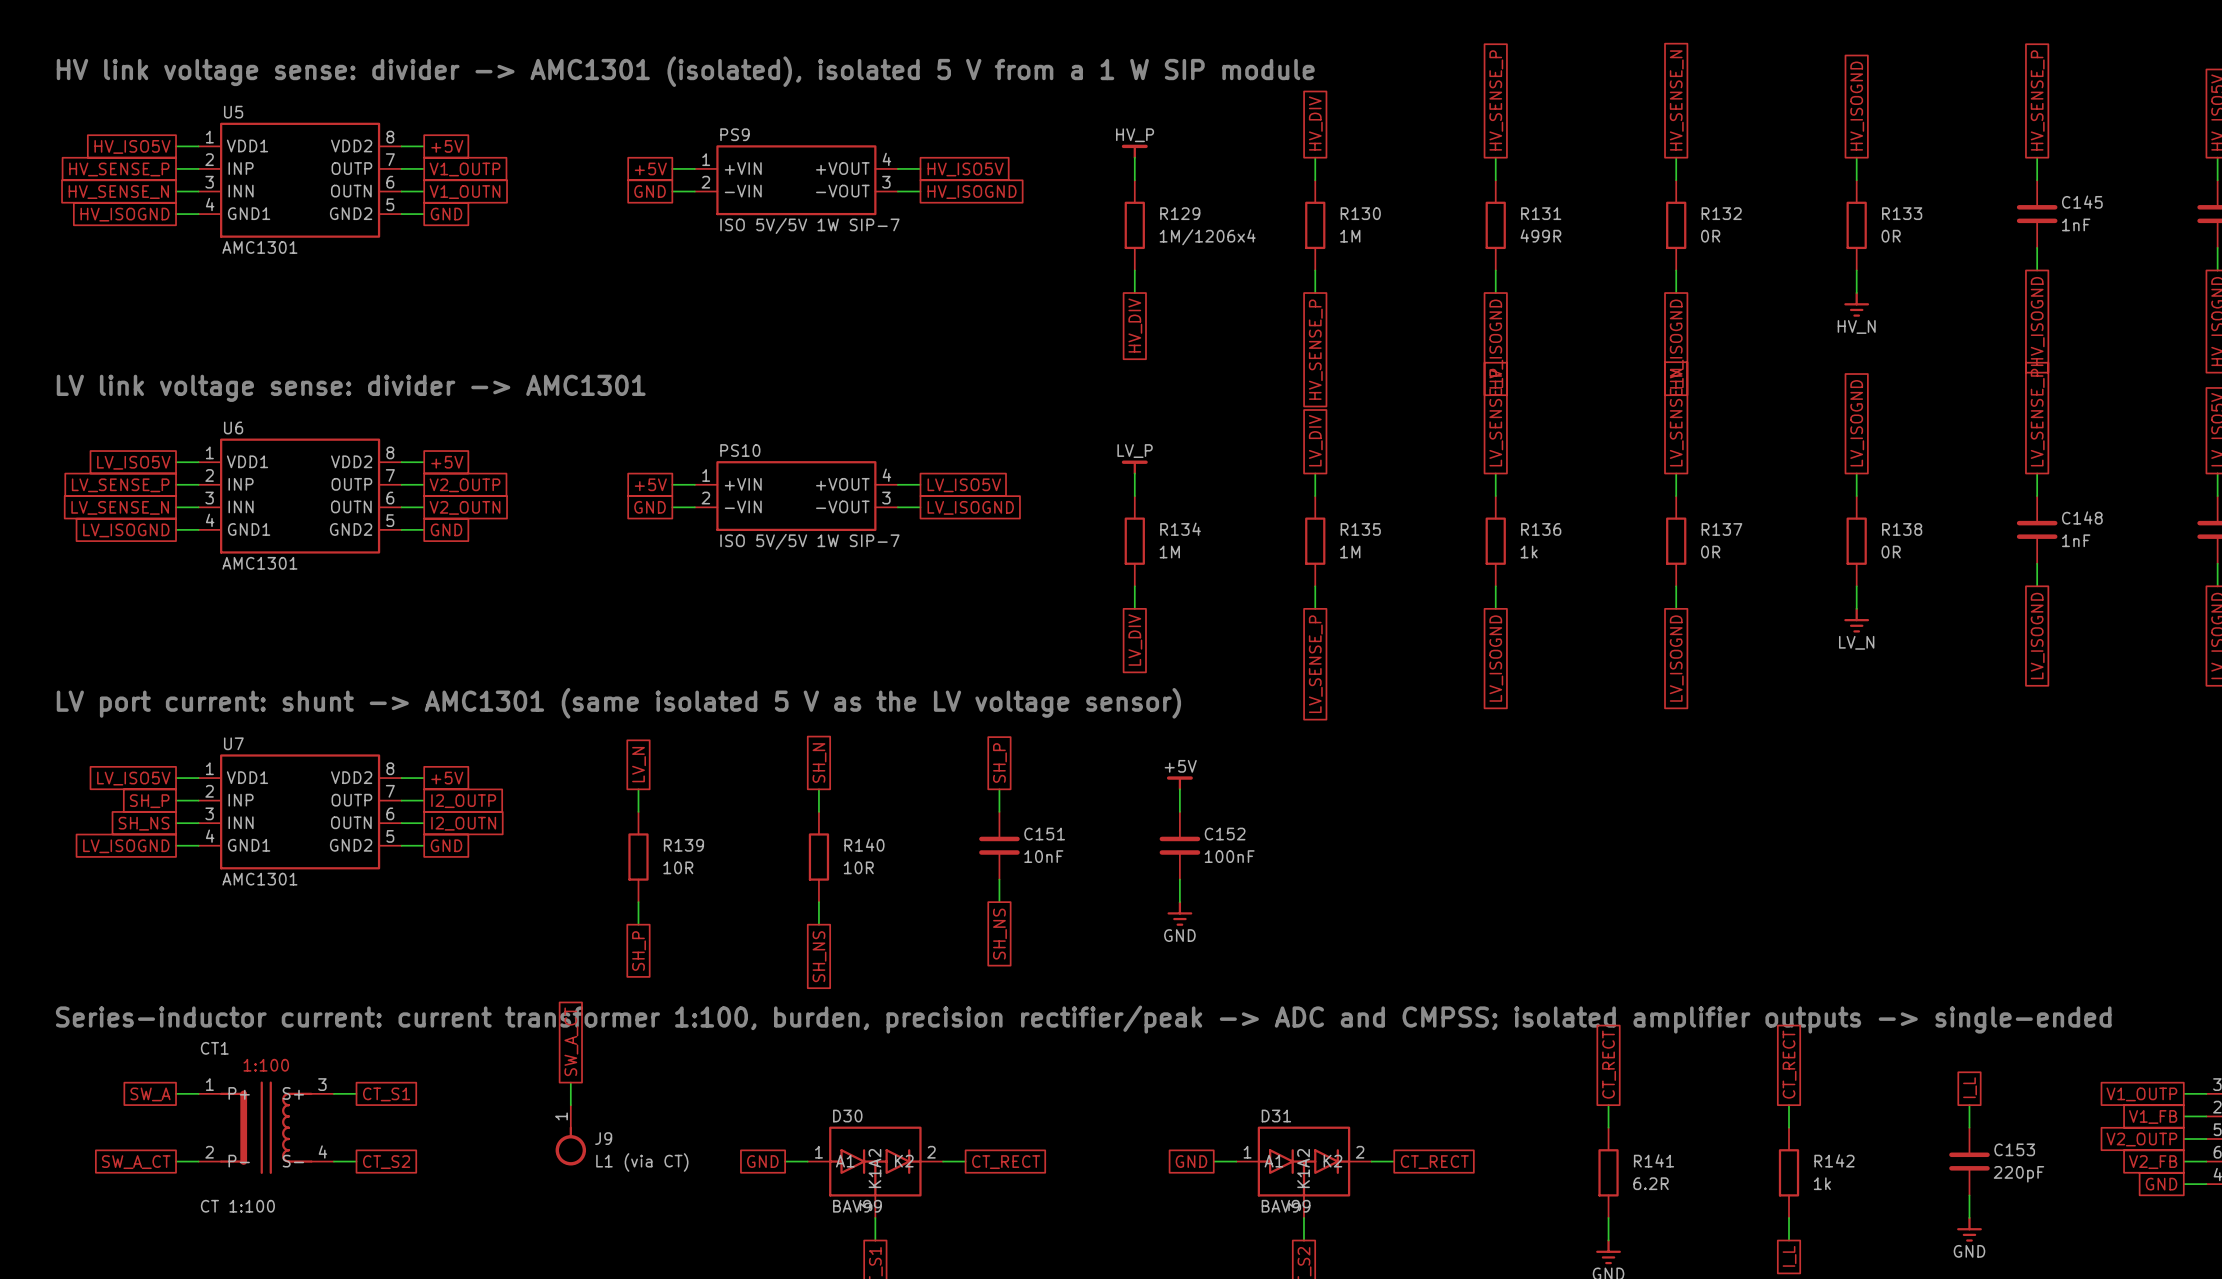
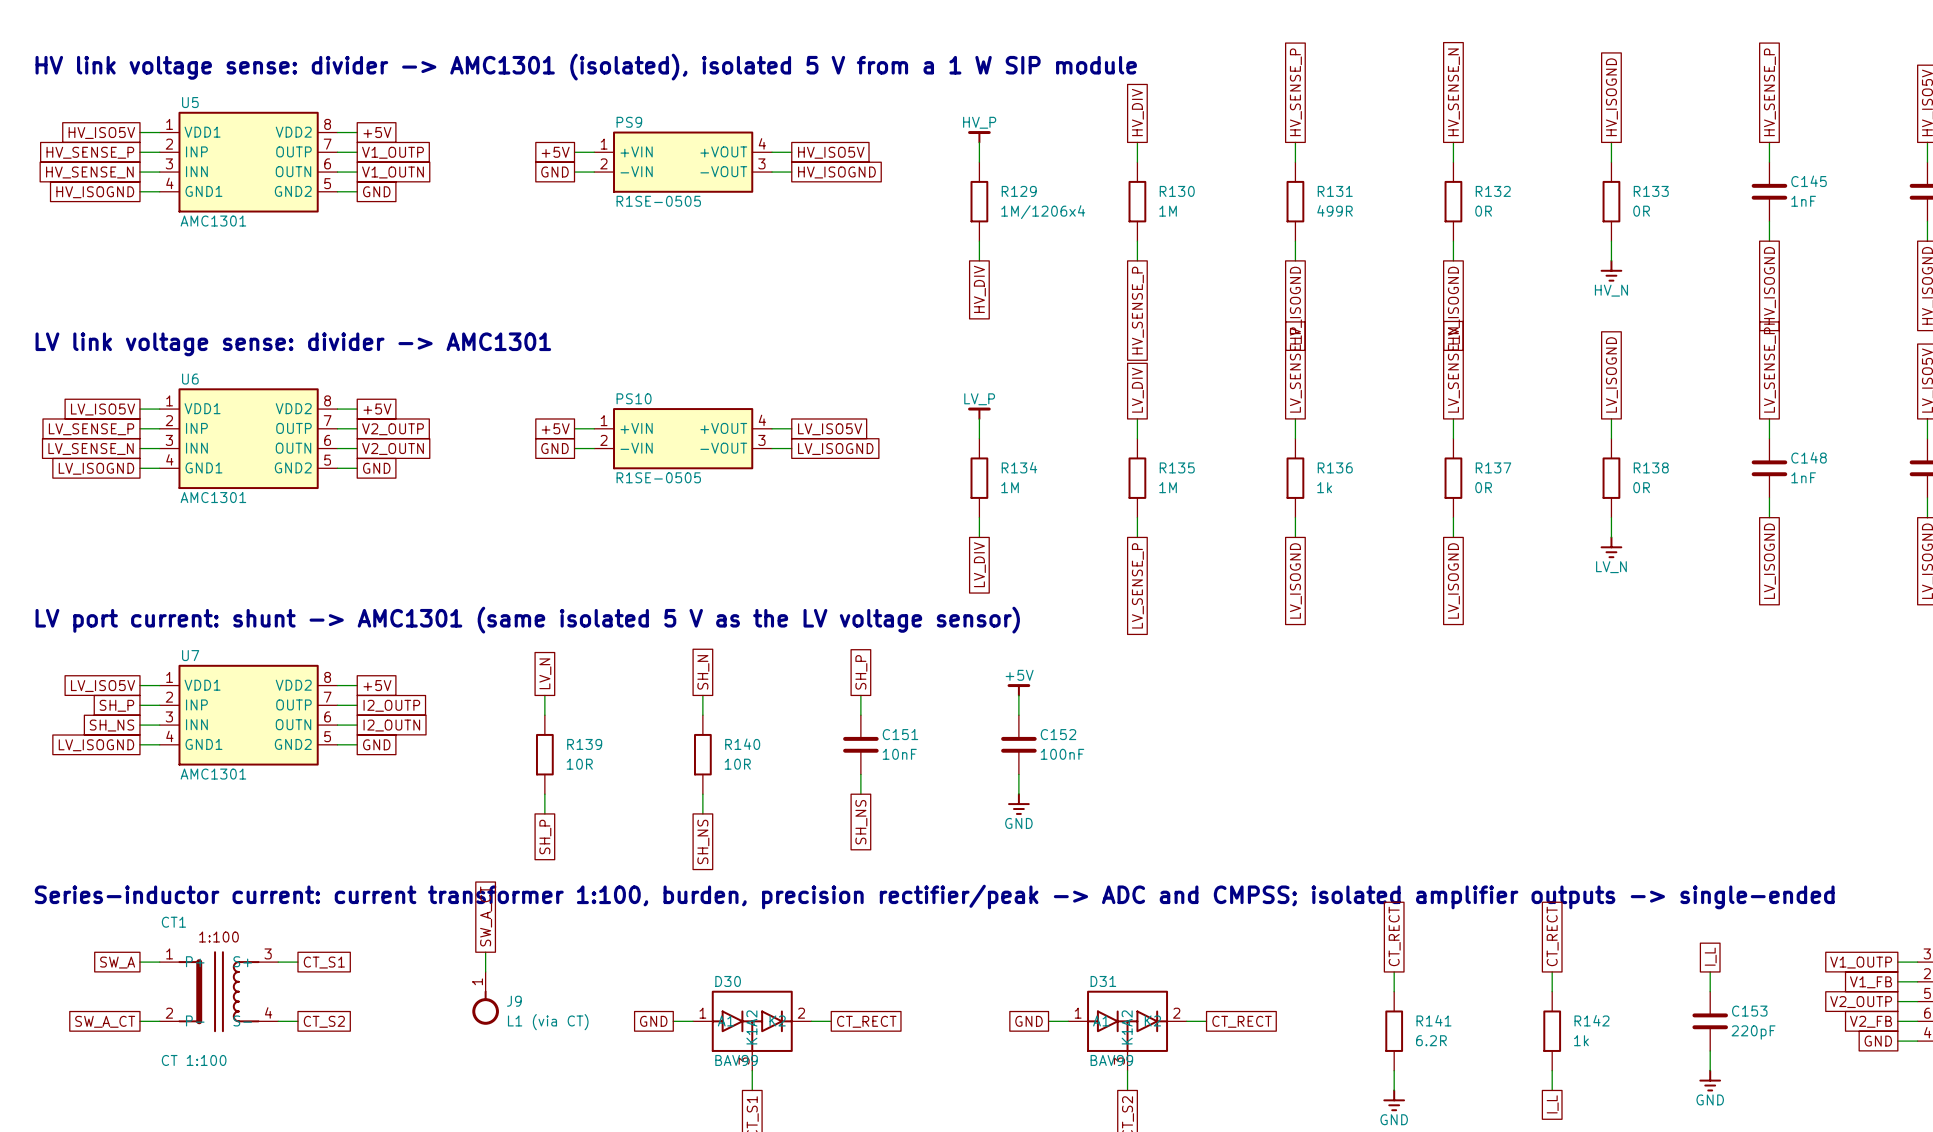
PS9 value: ISO 5V/5V 1W SIP-7 (809, 226) -> R1SE-0505 (658, 201)
PS10 value: ISO 5V/5V 1W SIP-7 (809, 541) -> R1SE-0505 (658, 477)

